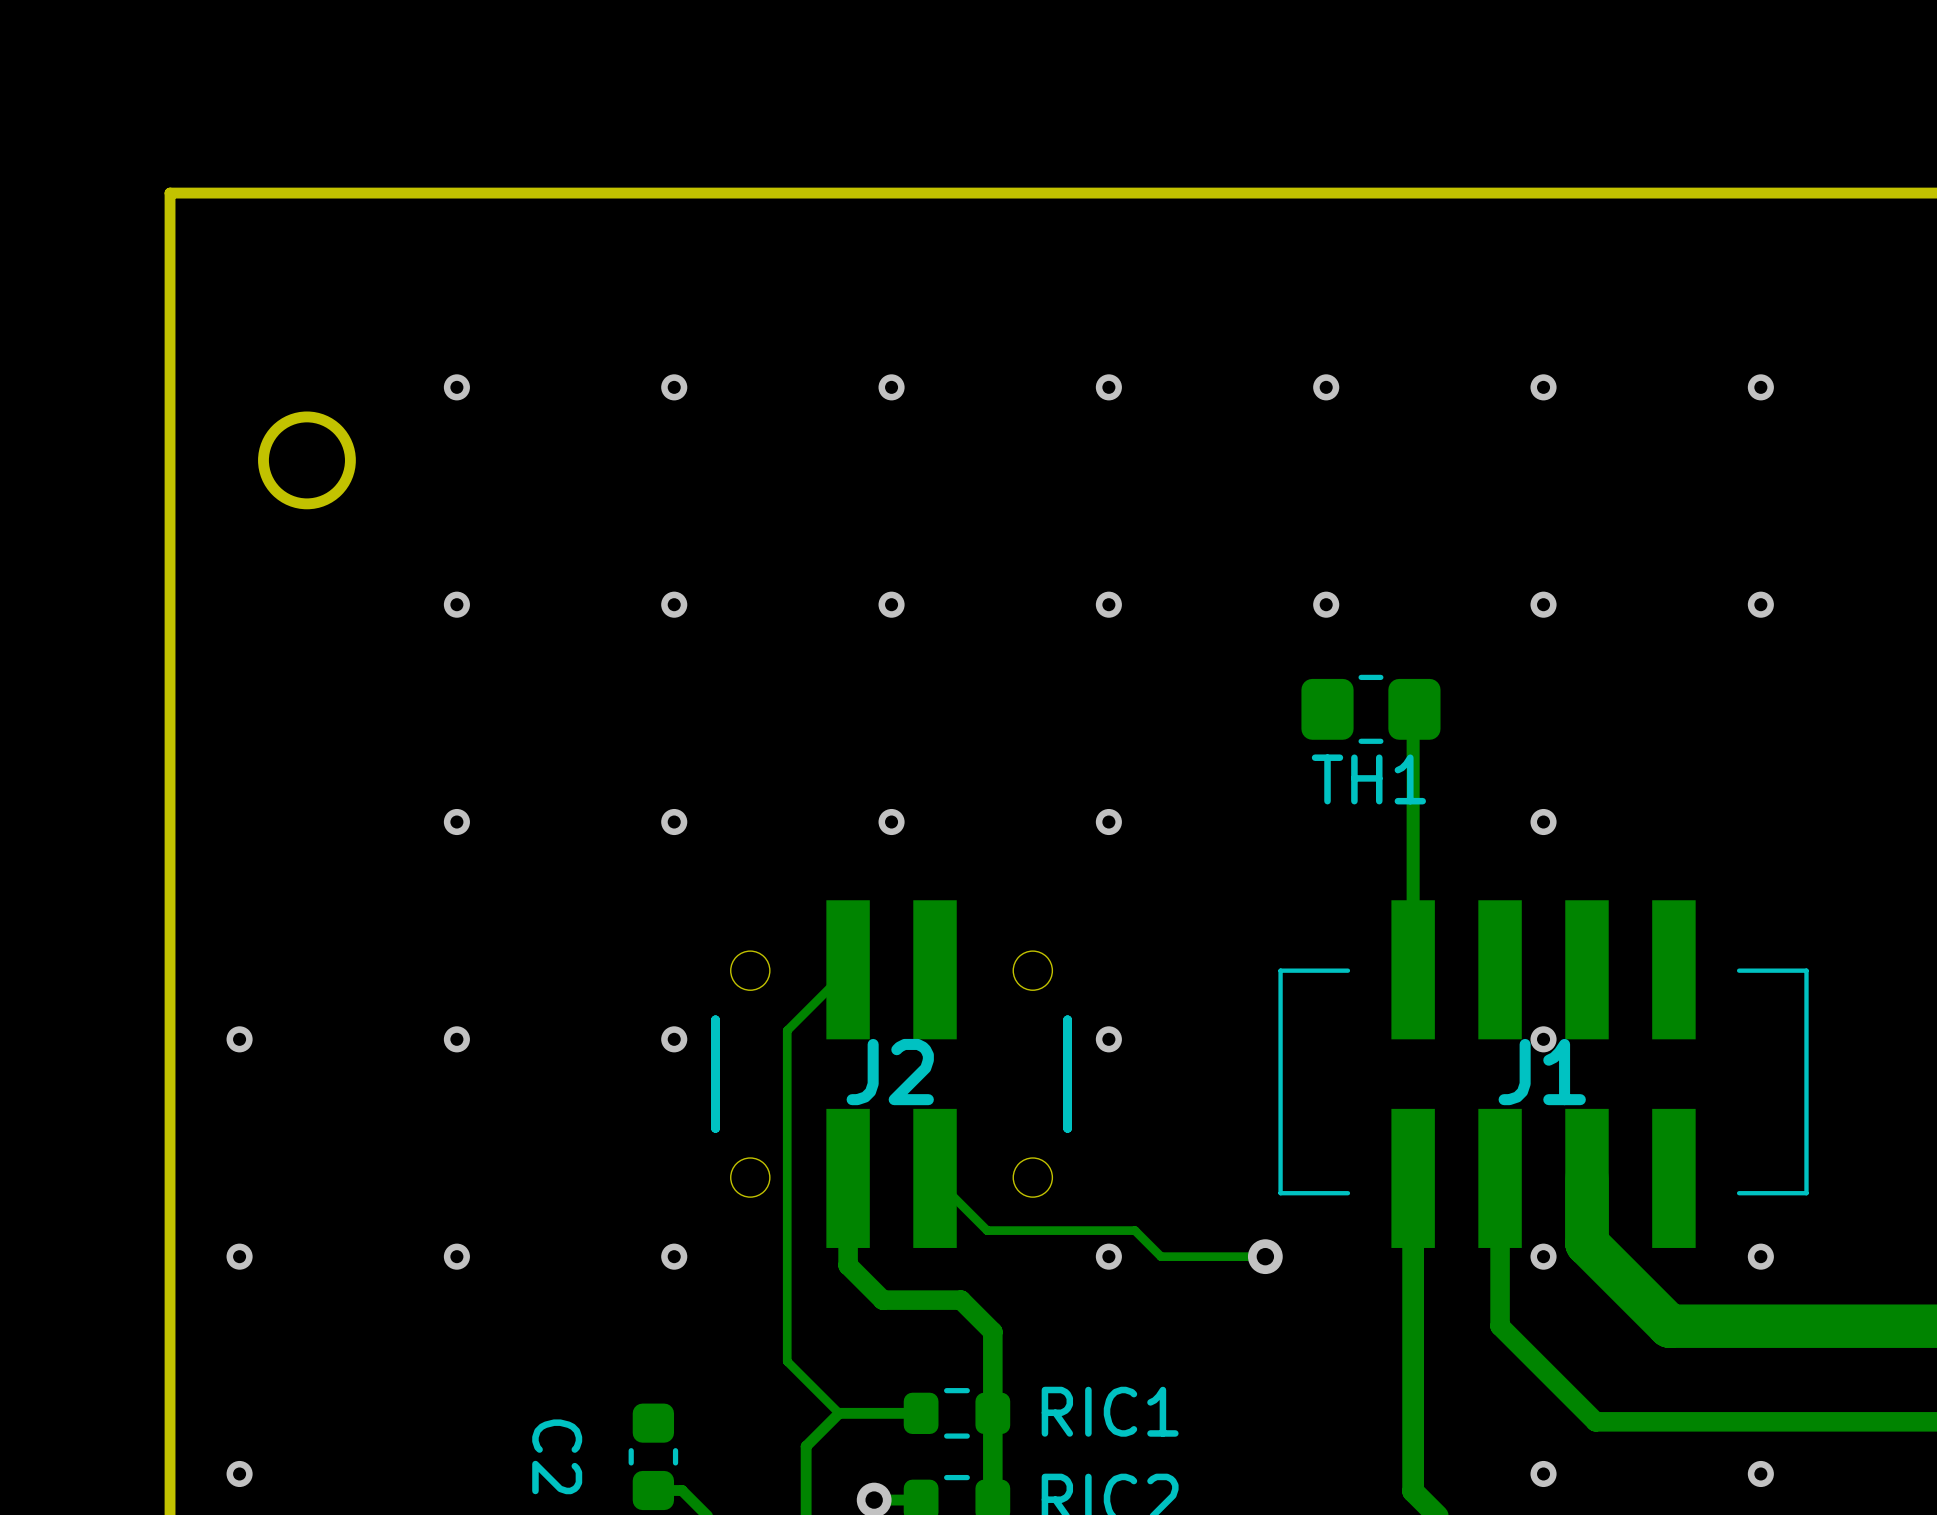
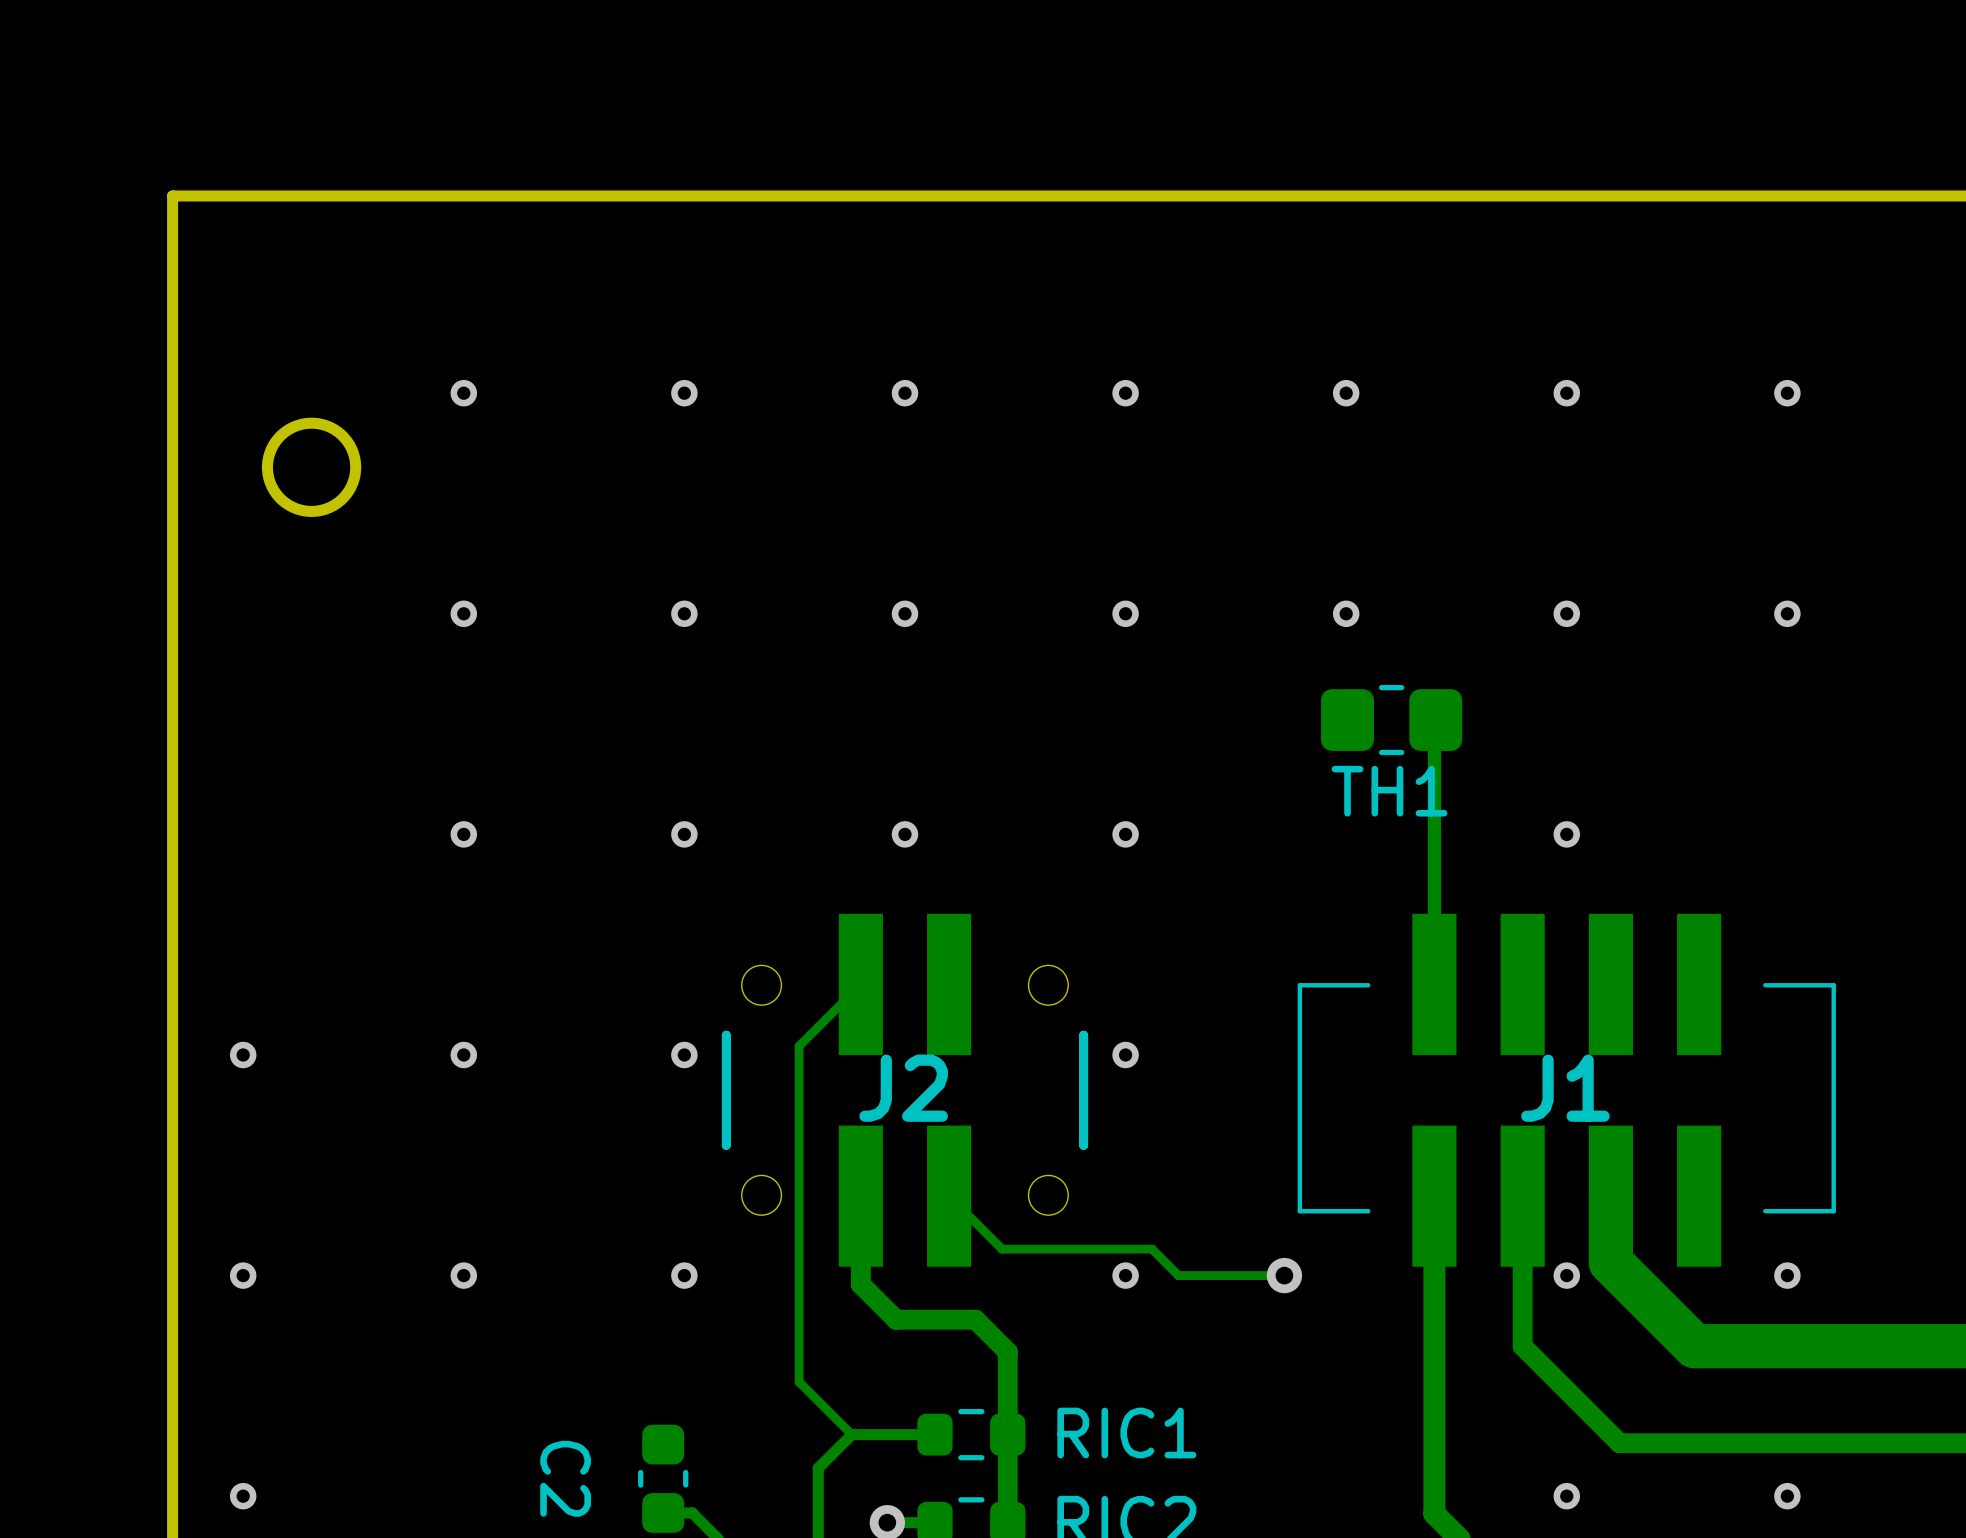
via: (1543, 1039) -> none

